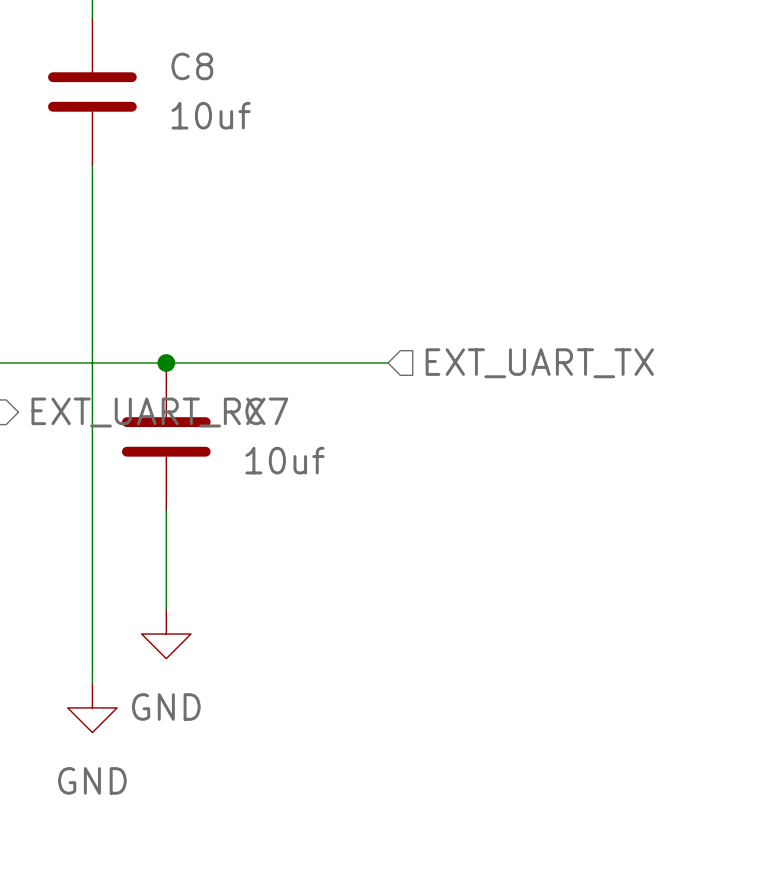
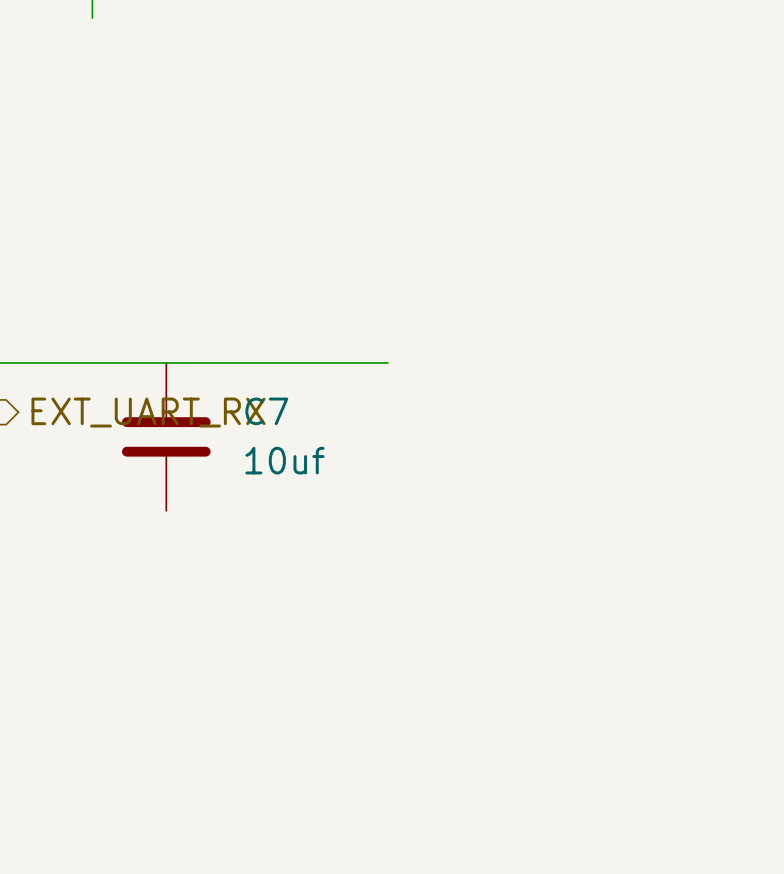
C8: 10uf (92, 91) -> none
wire: (92, 165) (92, 683) -> none
junction: (166, 363) -> none
hierarchical label: EXT_UART_TX (539, 363) -> none
wire: (166, 510) (166, 609) -> none
power symbol: GND (166, 634) -> none
power symbol: GND (92, 707) -> none

